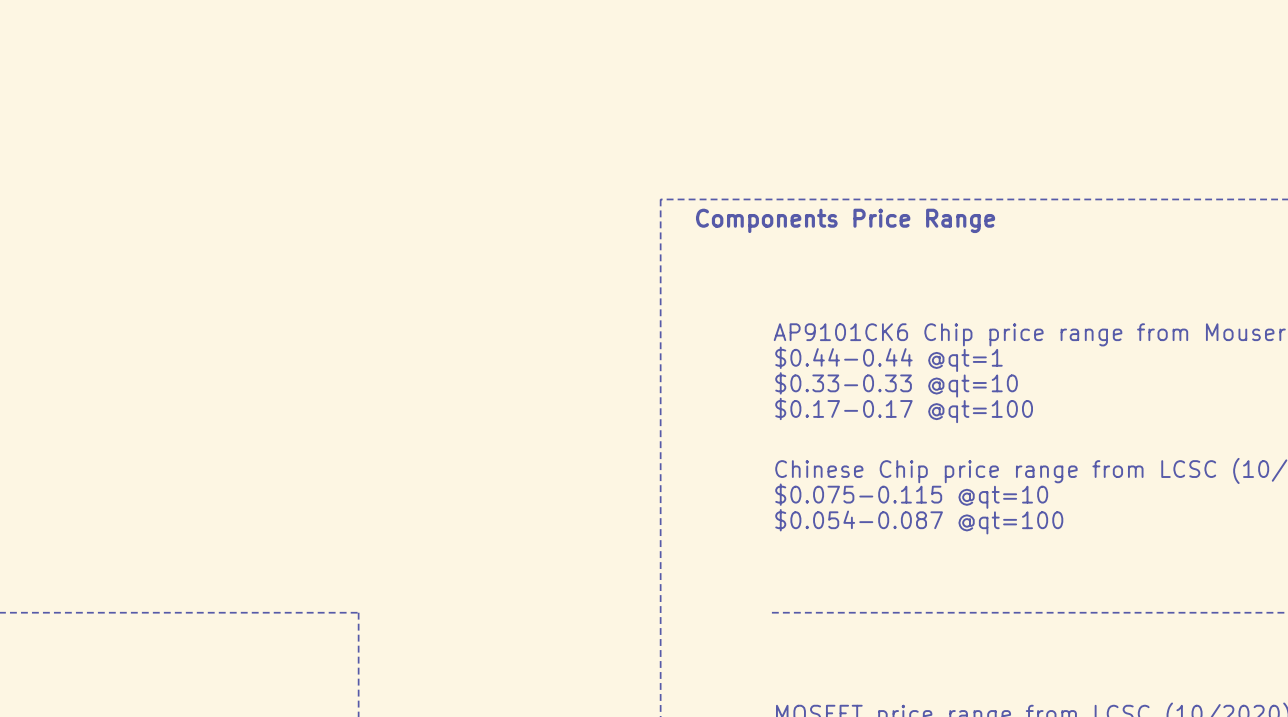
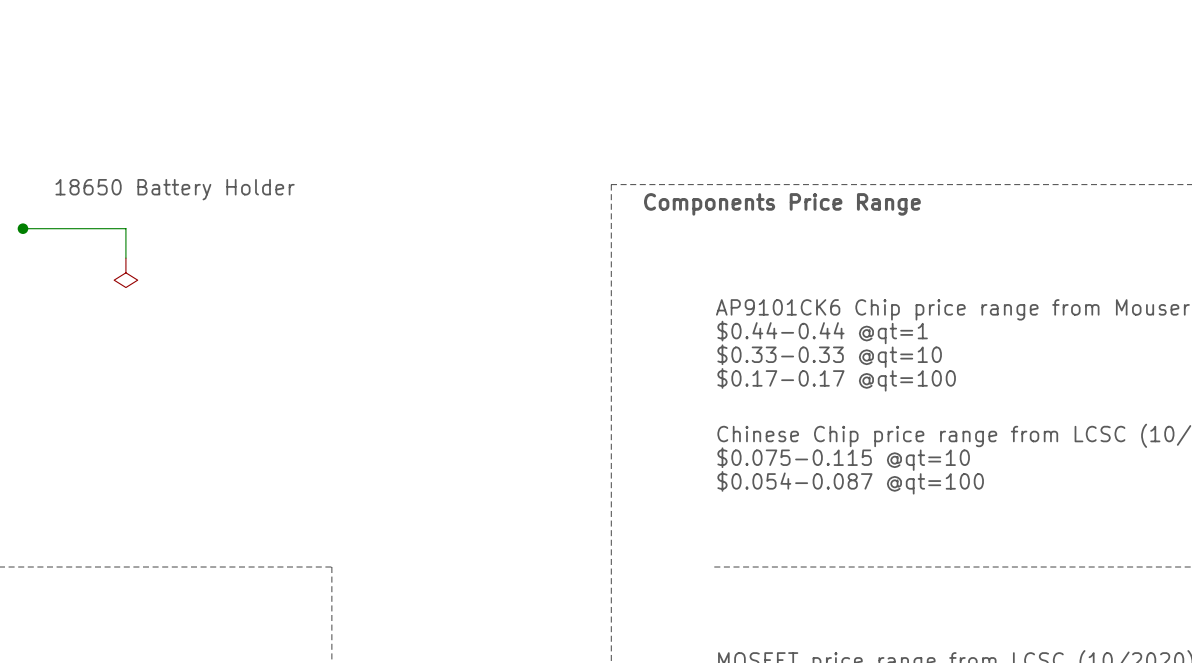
text: none -> 18650 Battery Holder (175, 189)
wire: none -> (22, 228) (125, 228) (125, 258)
junction: none -> (22, 228)
power symbol: none -> (125, 272)

